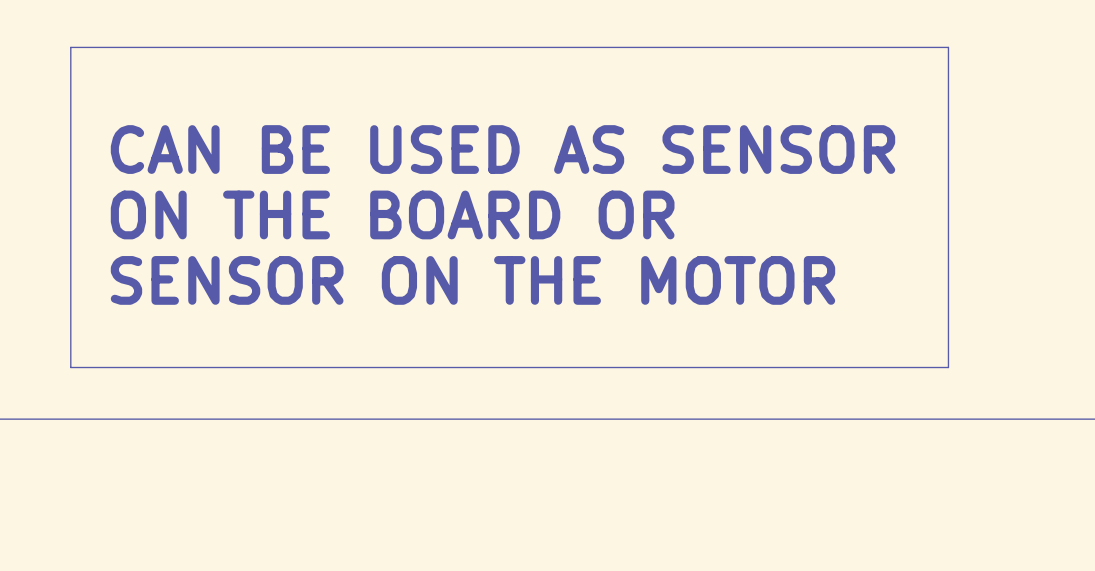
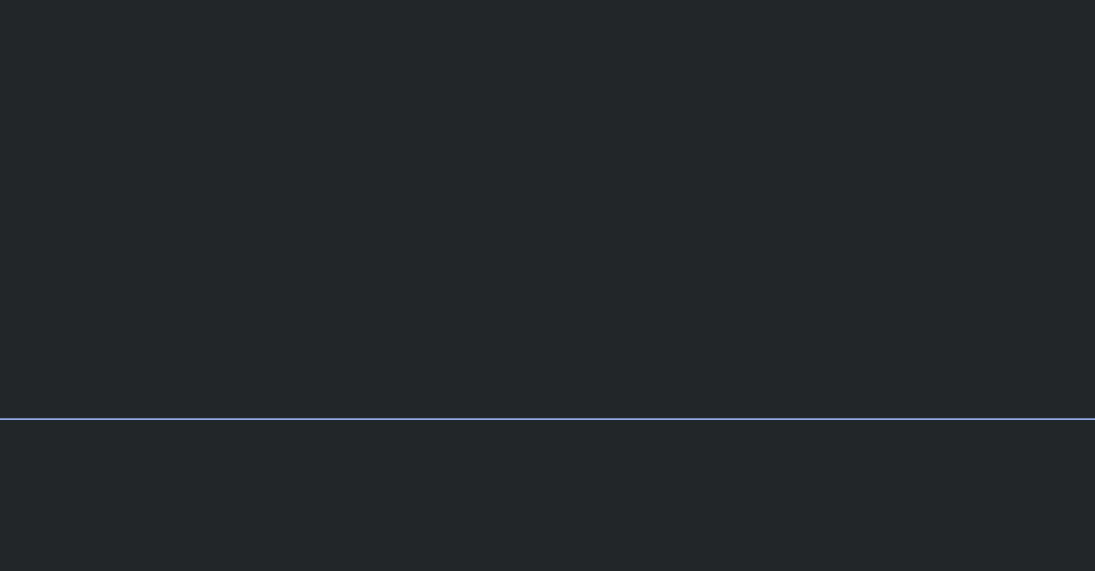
line: (70, 47) (948, 47) (948, 367) (70, 367) (70, 47) -> none
text: CAN BE USED AS SENSOR (502, 149) -> none
text: ON THE BOARD OR (392, 214) -> none
text: SENSOR ON THE MOTOR (472, 280) -> none

